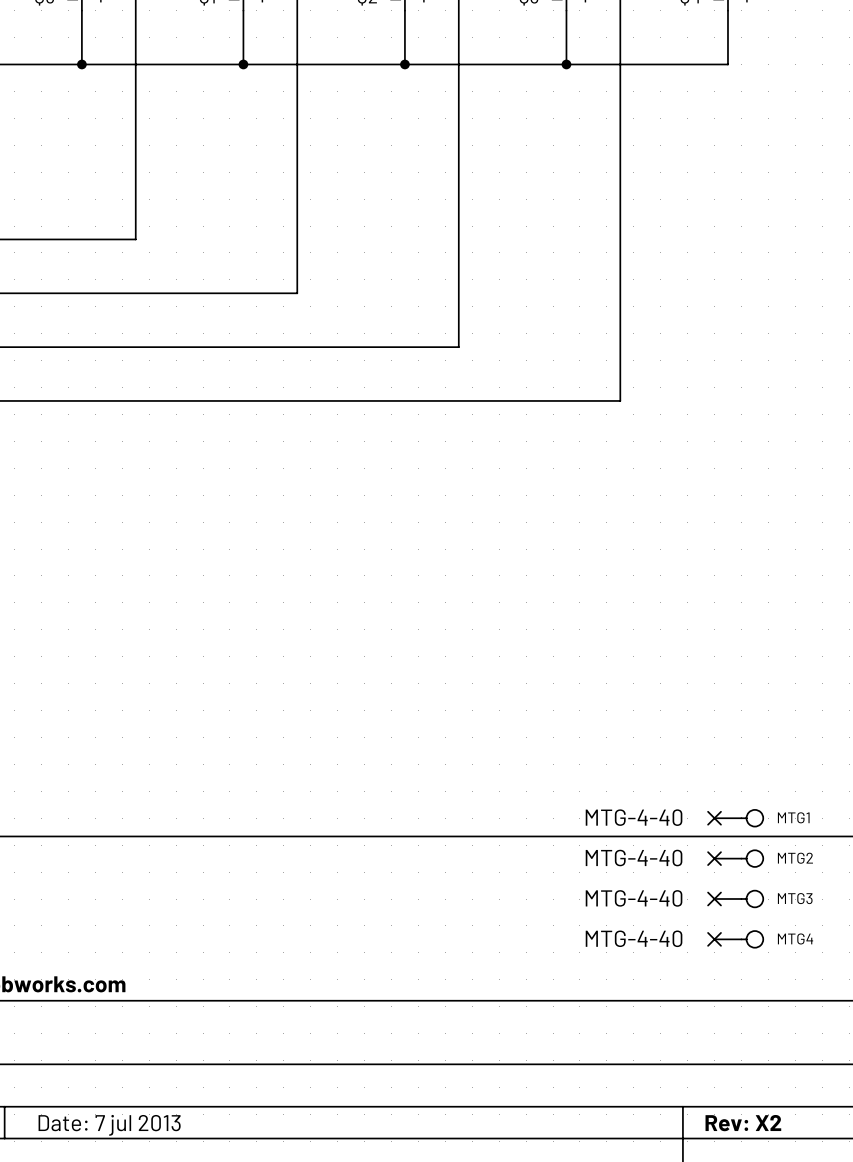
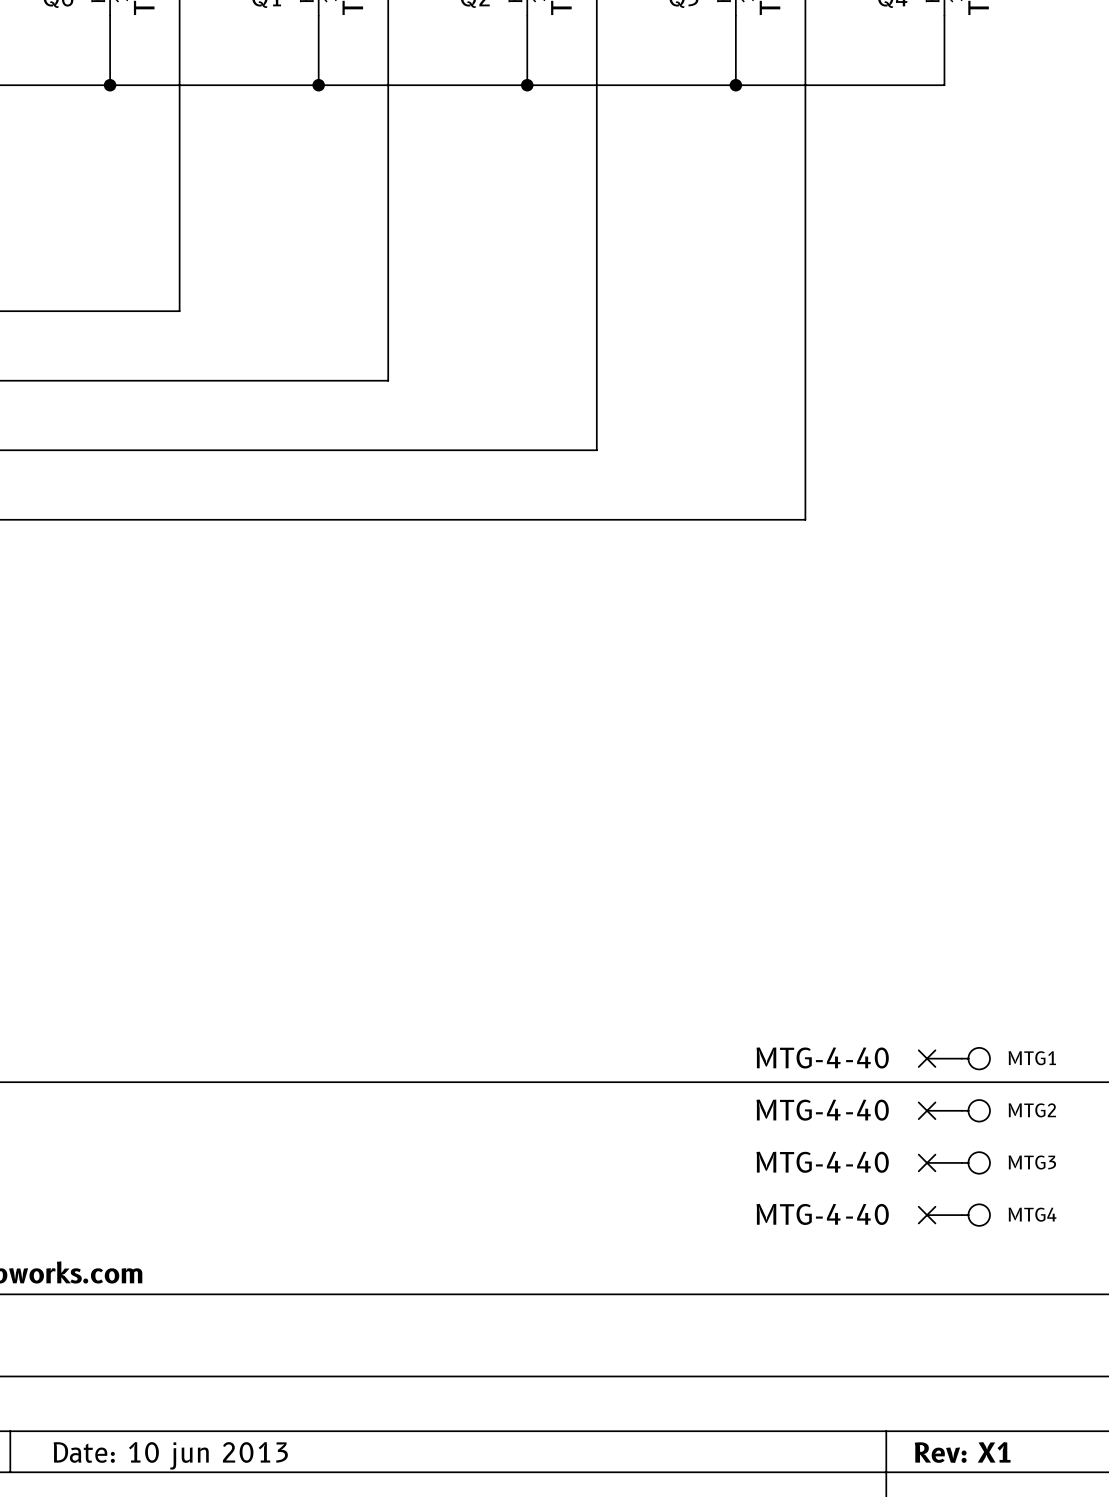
title block: Rev: X2 (743, 1123) -> Rev: X1 (962, 1452)
title block: Date: 7 jul 2013 (109, 1125) -> Date: 10 jun 2013 (170, 1455)

